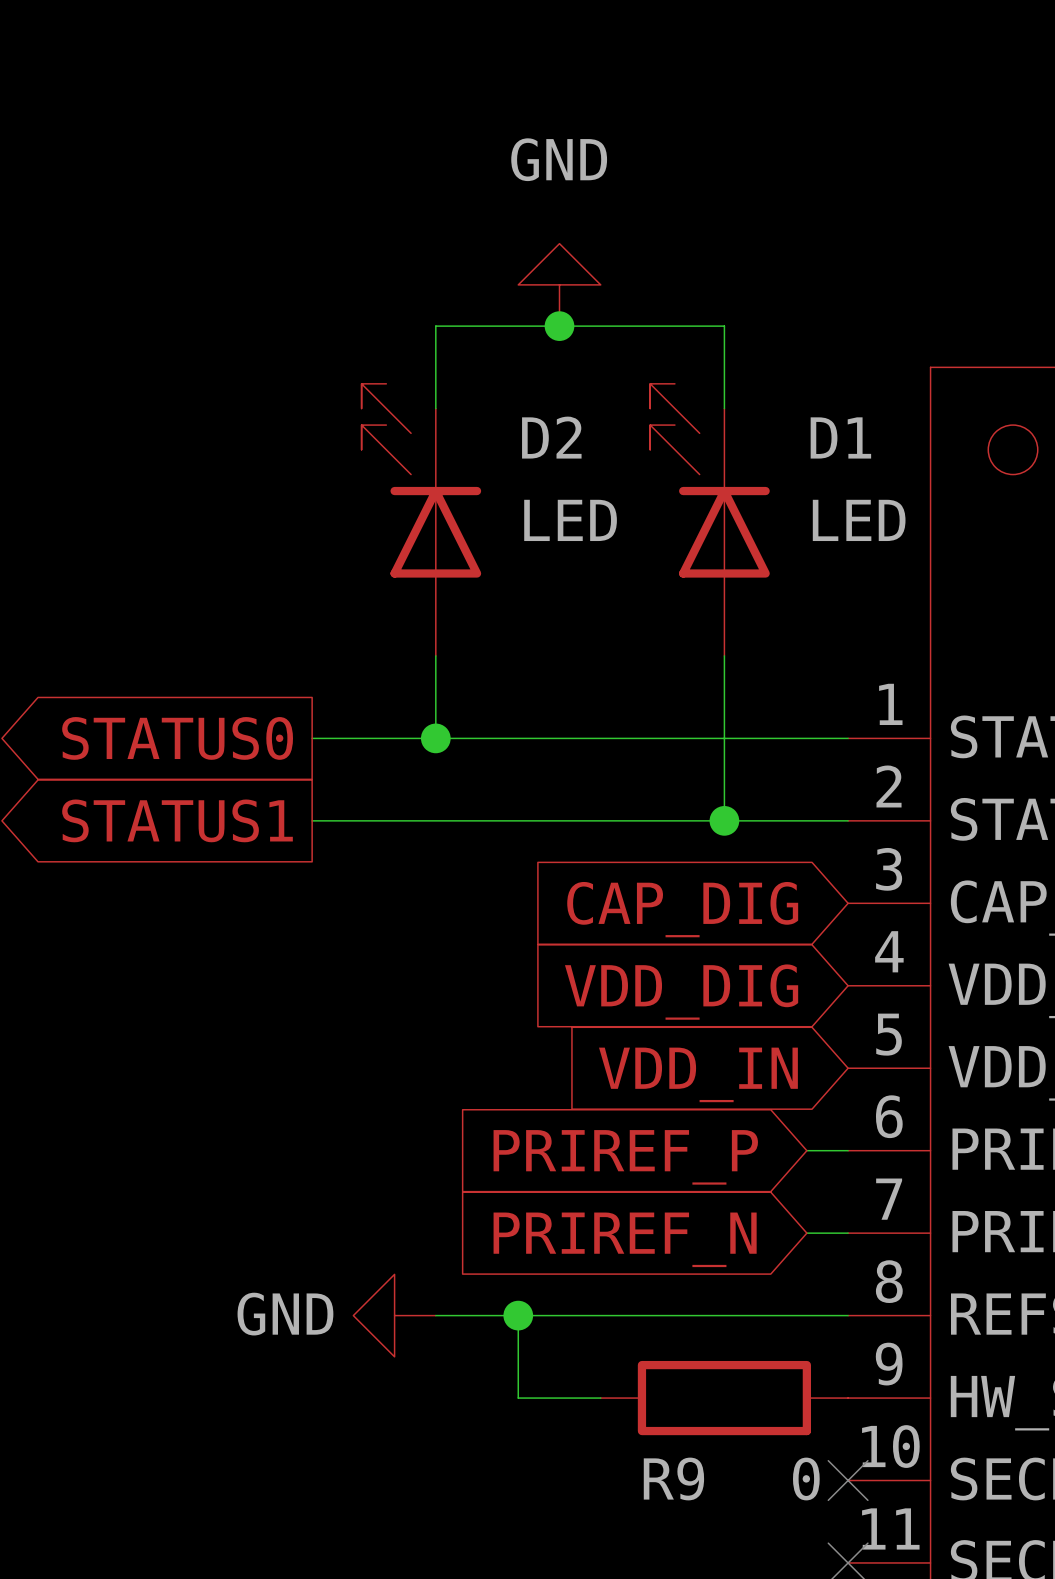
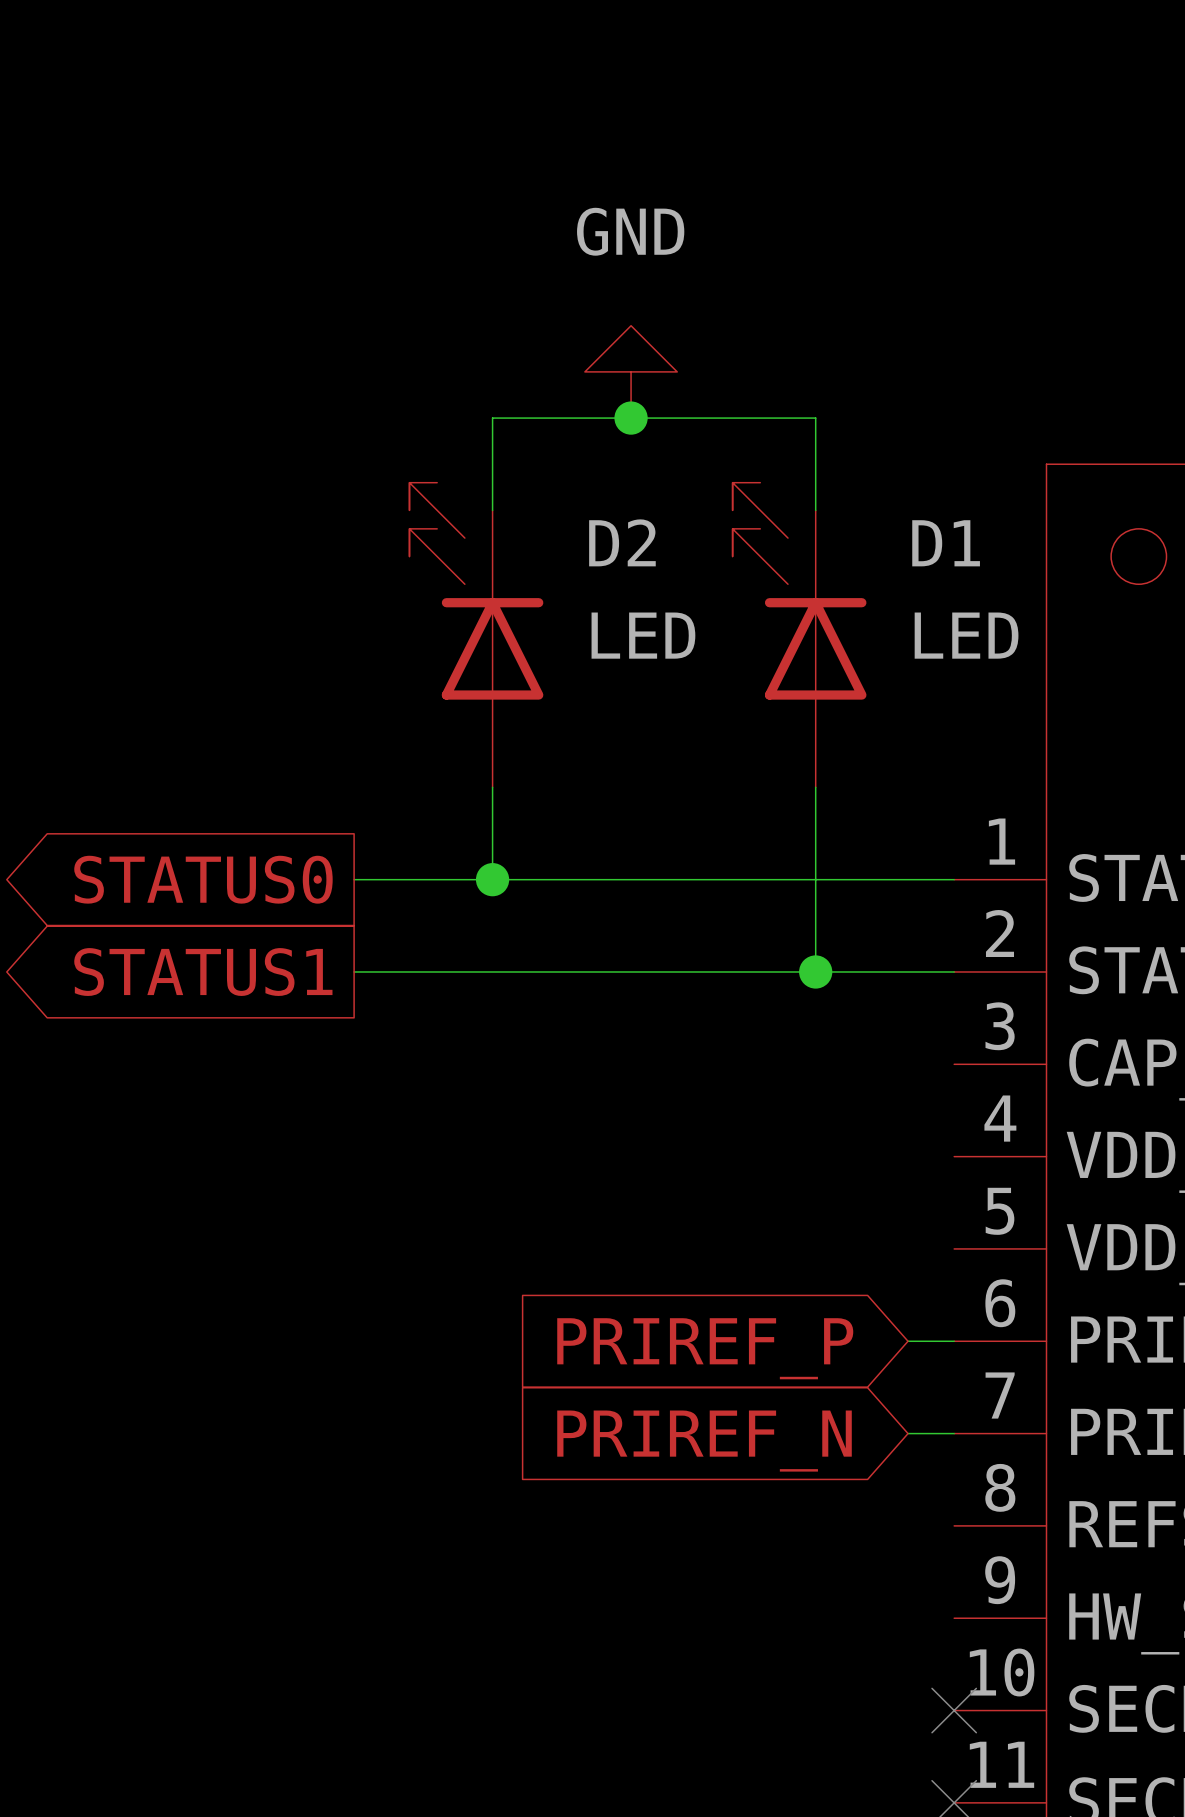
global label: CAP_DIG (682, 909) -> none
global label: VDD_DIG (681, 992) -> none
global label: VDD_IN (698, 1074) -> none
power symbol: GND (394, 1315) -> none
wire: (435, 1315) (848, 1315) -> none
wire: (518, 1315) (518, 1398) (600, 1398) -> none
junction: (518, 1315) -> none
R9: 0 (724, 1398) -> none

